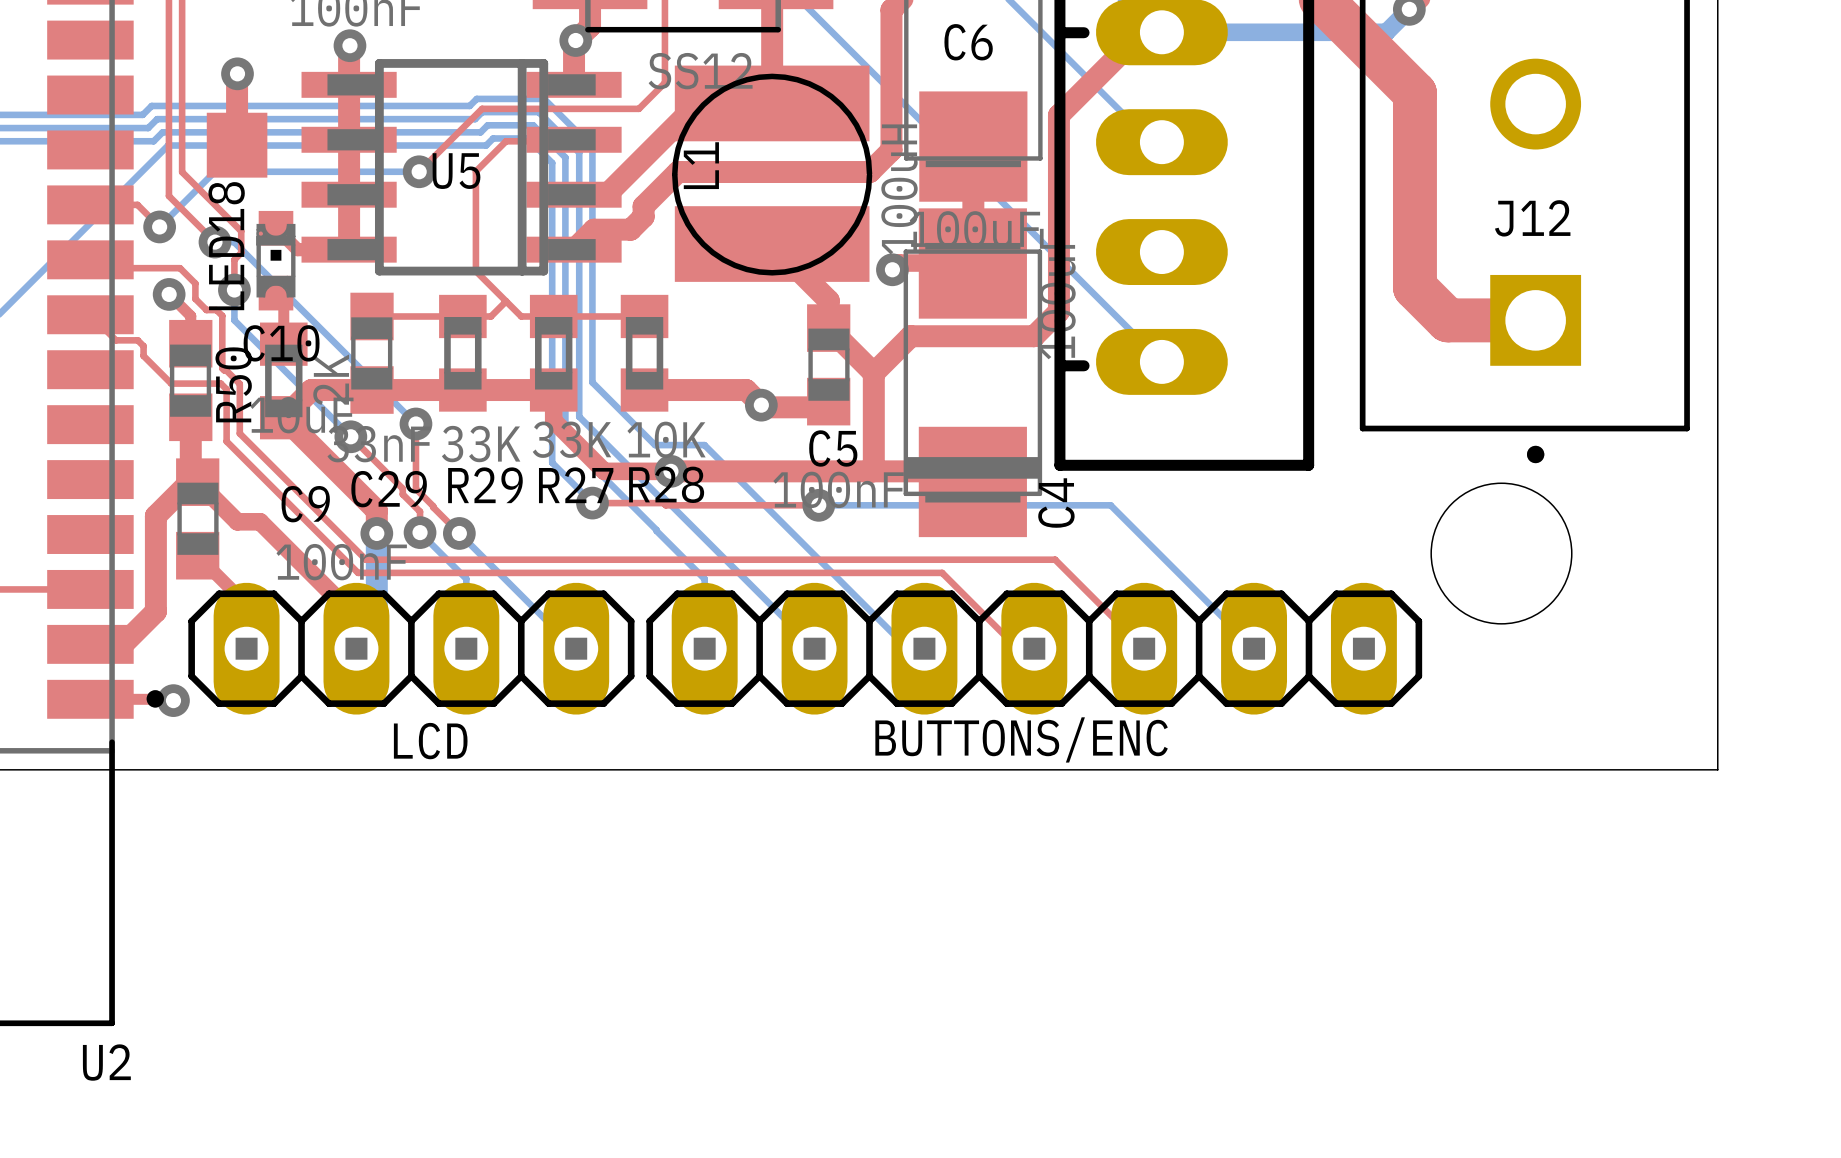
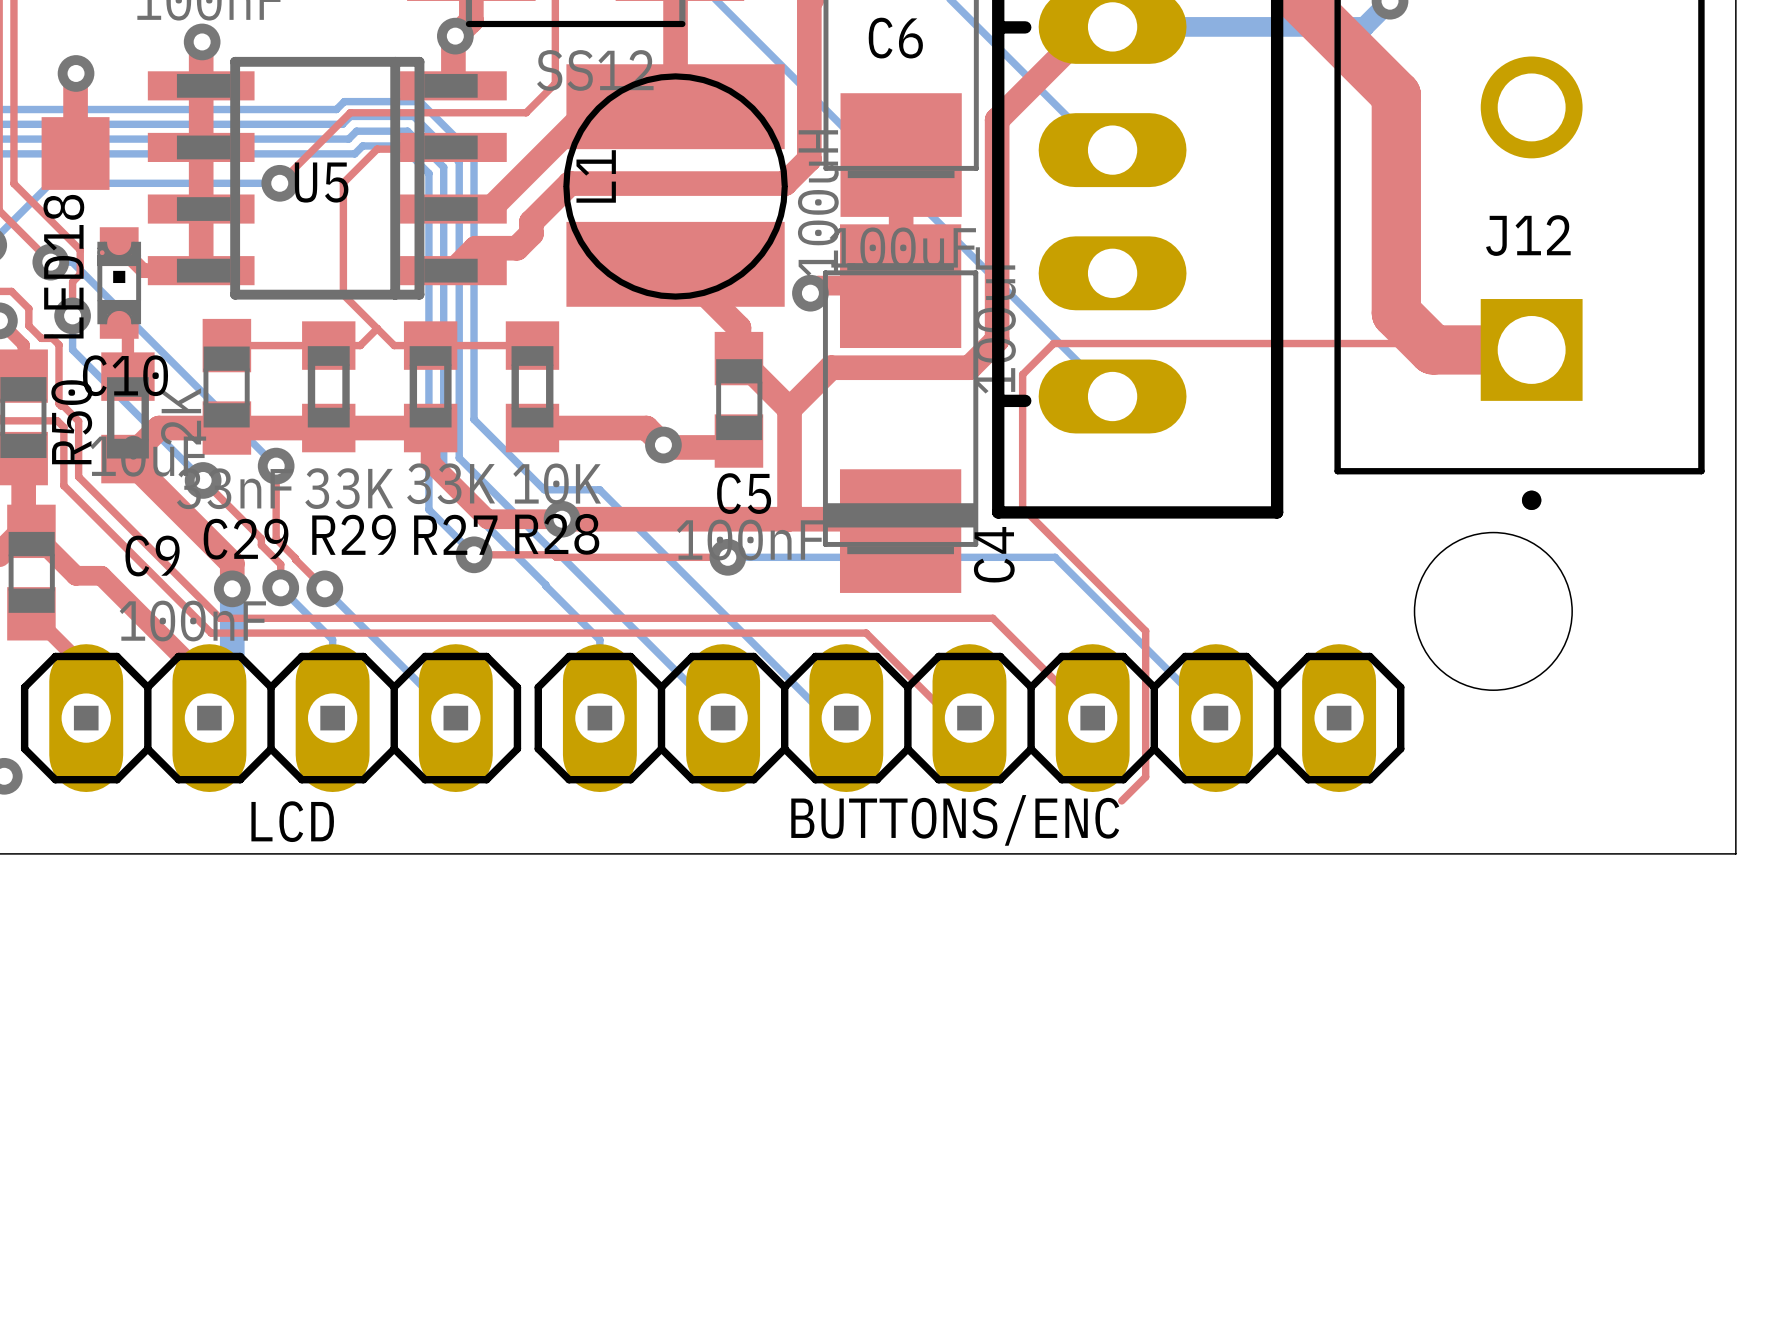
top track: none -> (1531, 349) (1525, 343) (1053, 343) (1022, 374) (1022, 508) (1145, 631) (1145, 776) (1121, 800)

